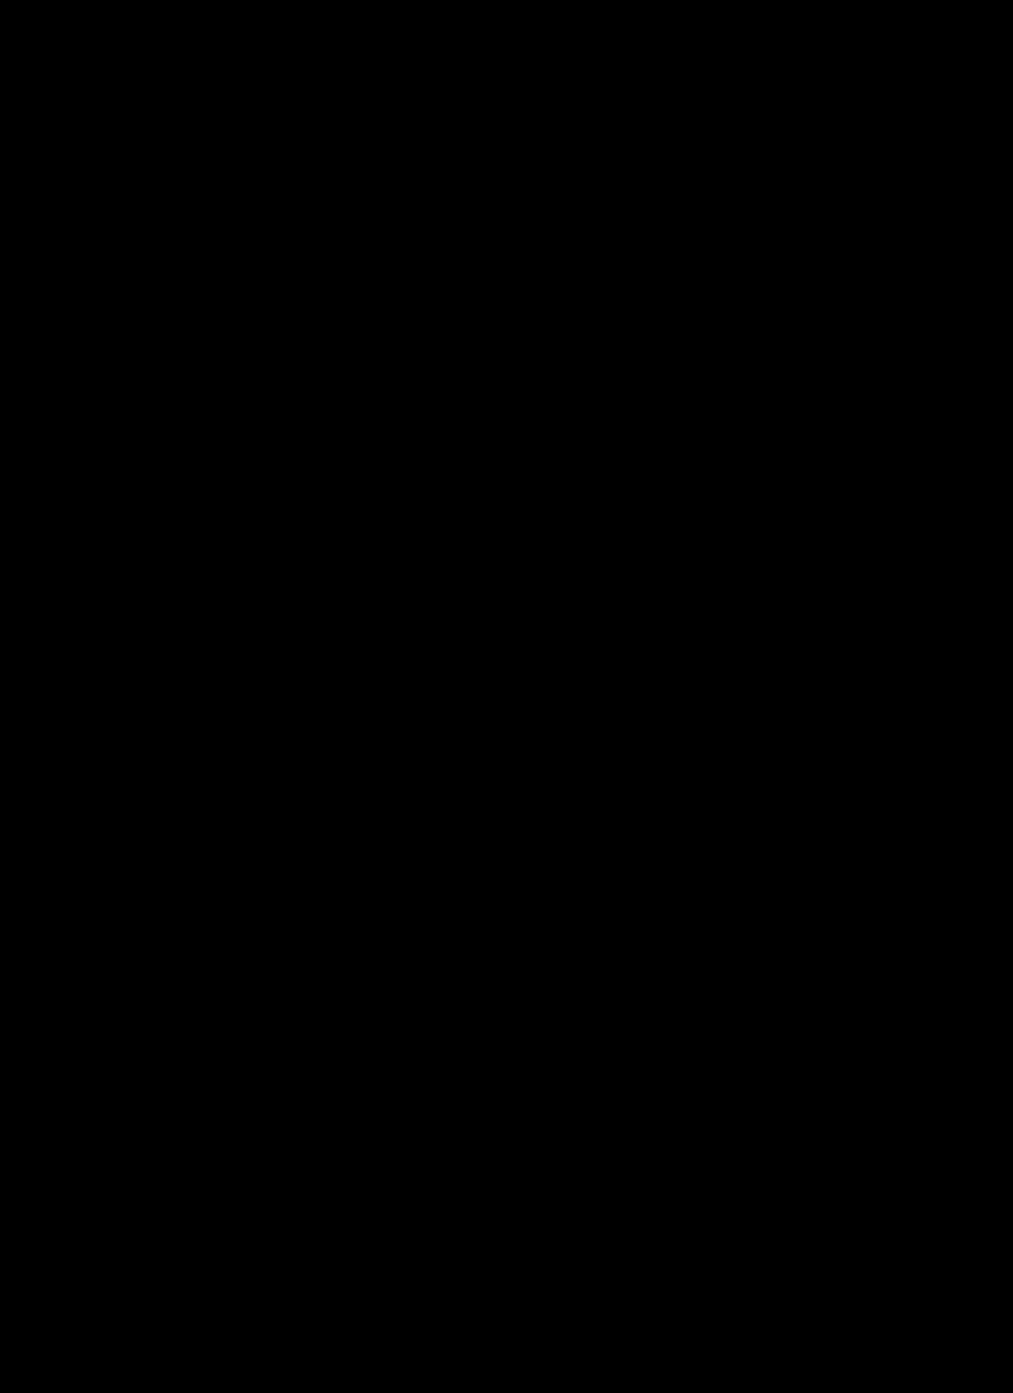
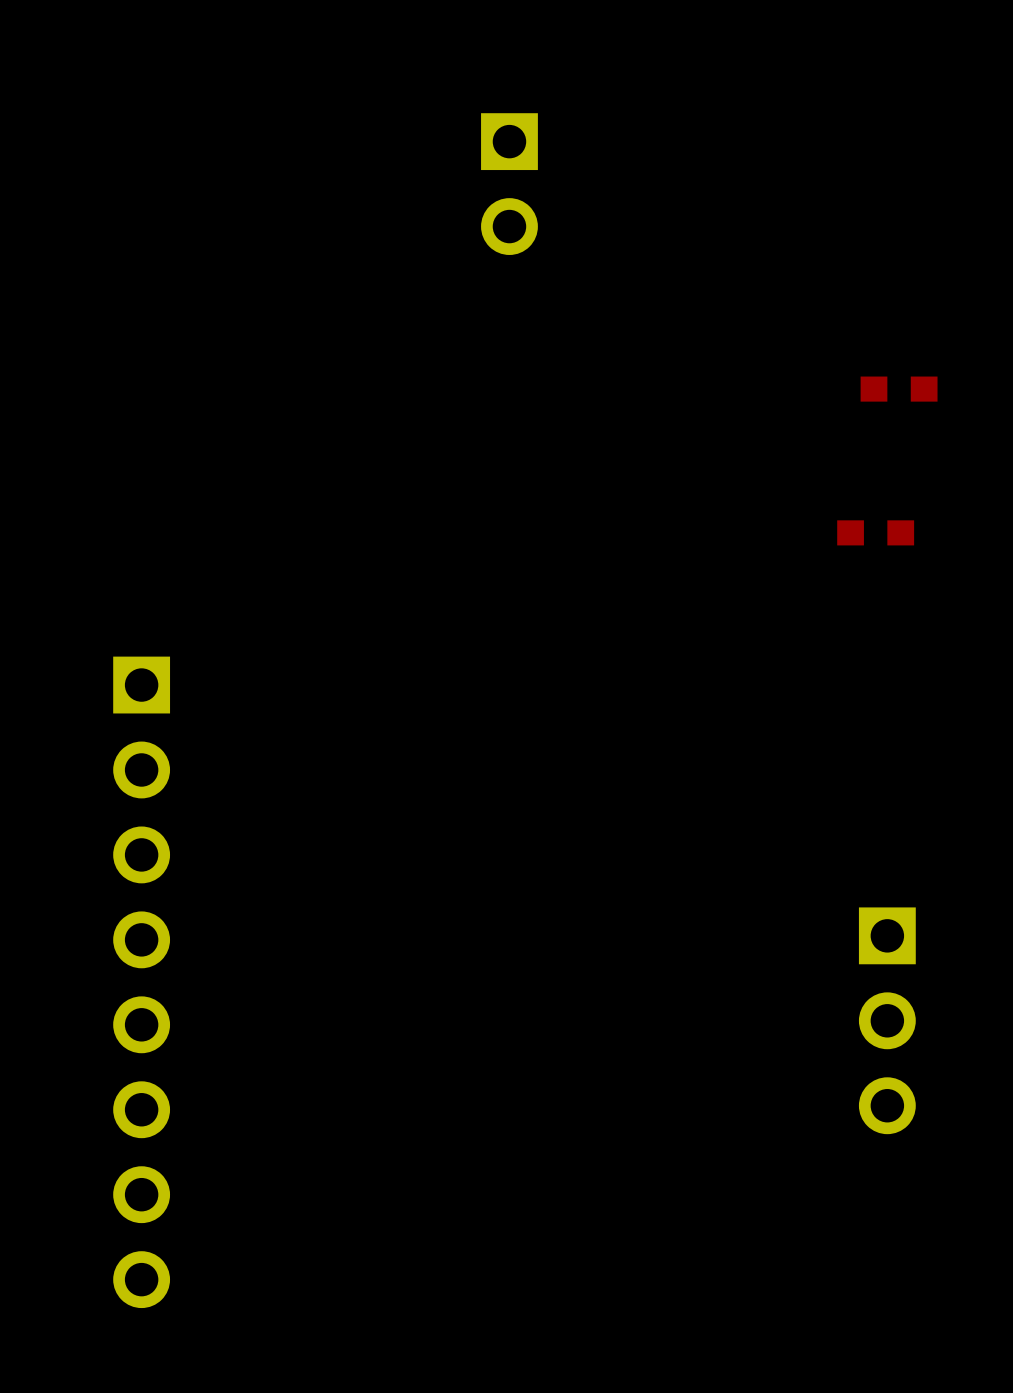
part: none -> (509, 184)
part: none -> (899, 389)
part: none -> (875, 532)
part: none -> (141, 982)
part: none -> (887, 1020)

